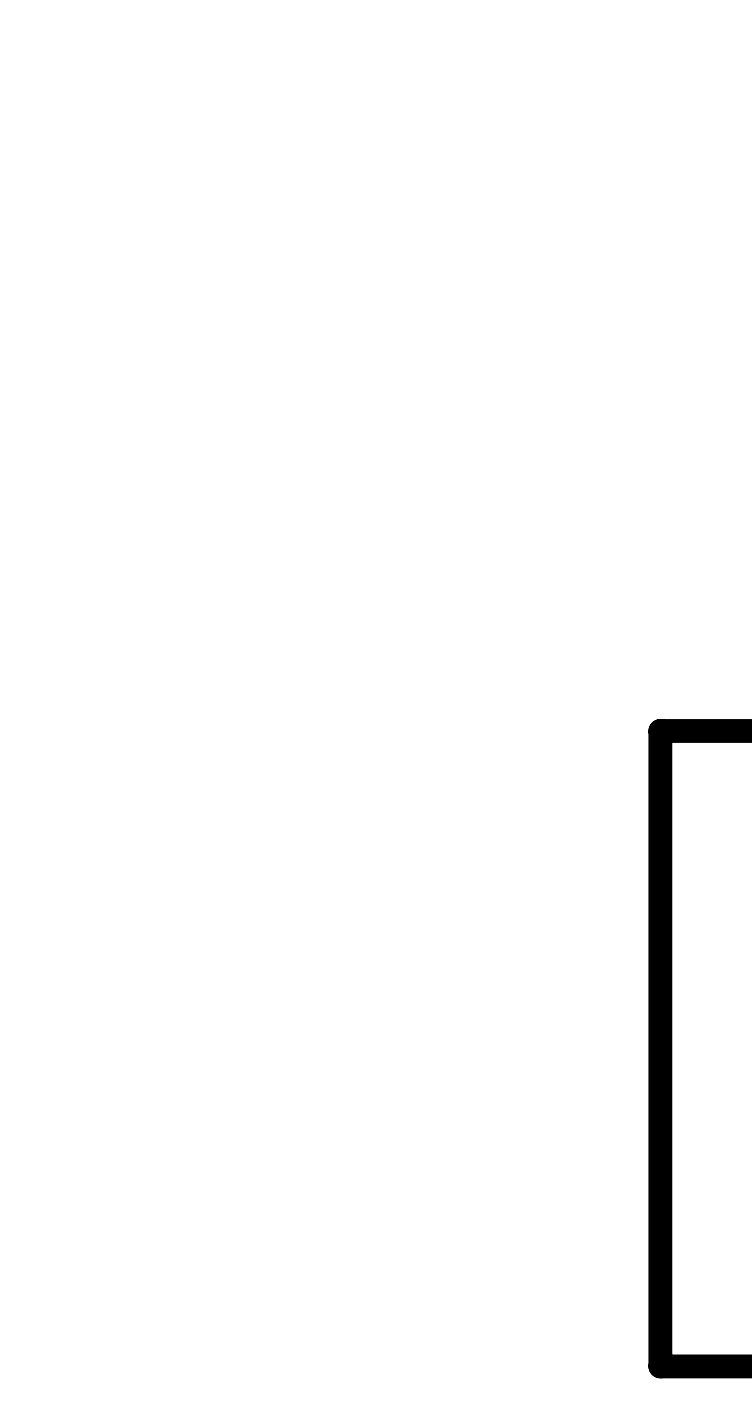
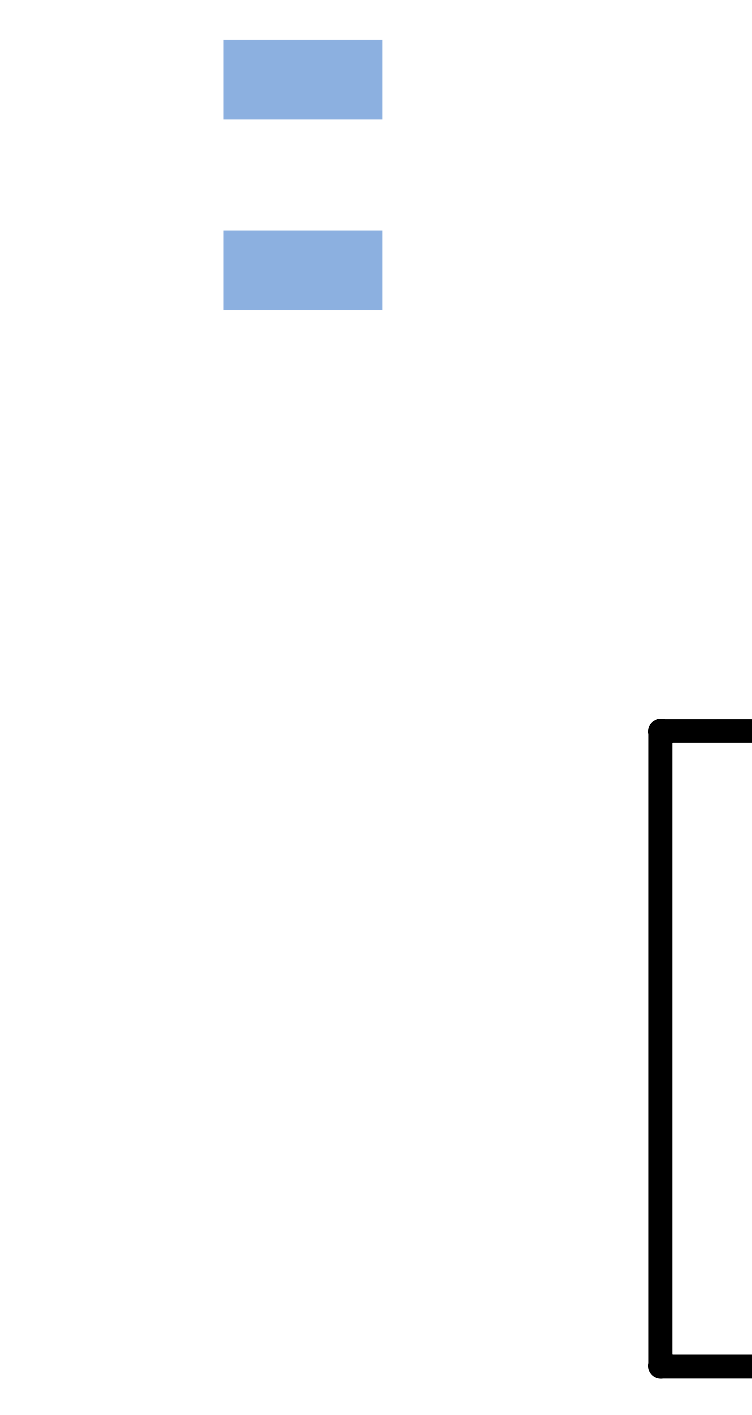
part: none -> (302, 174)

